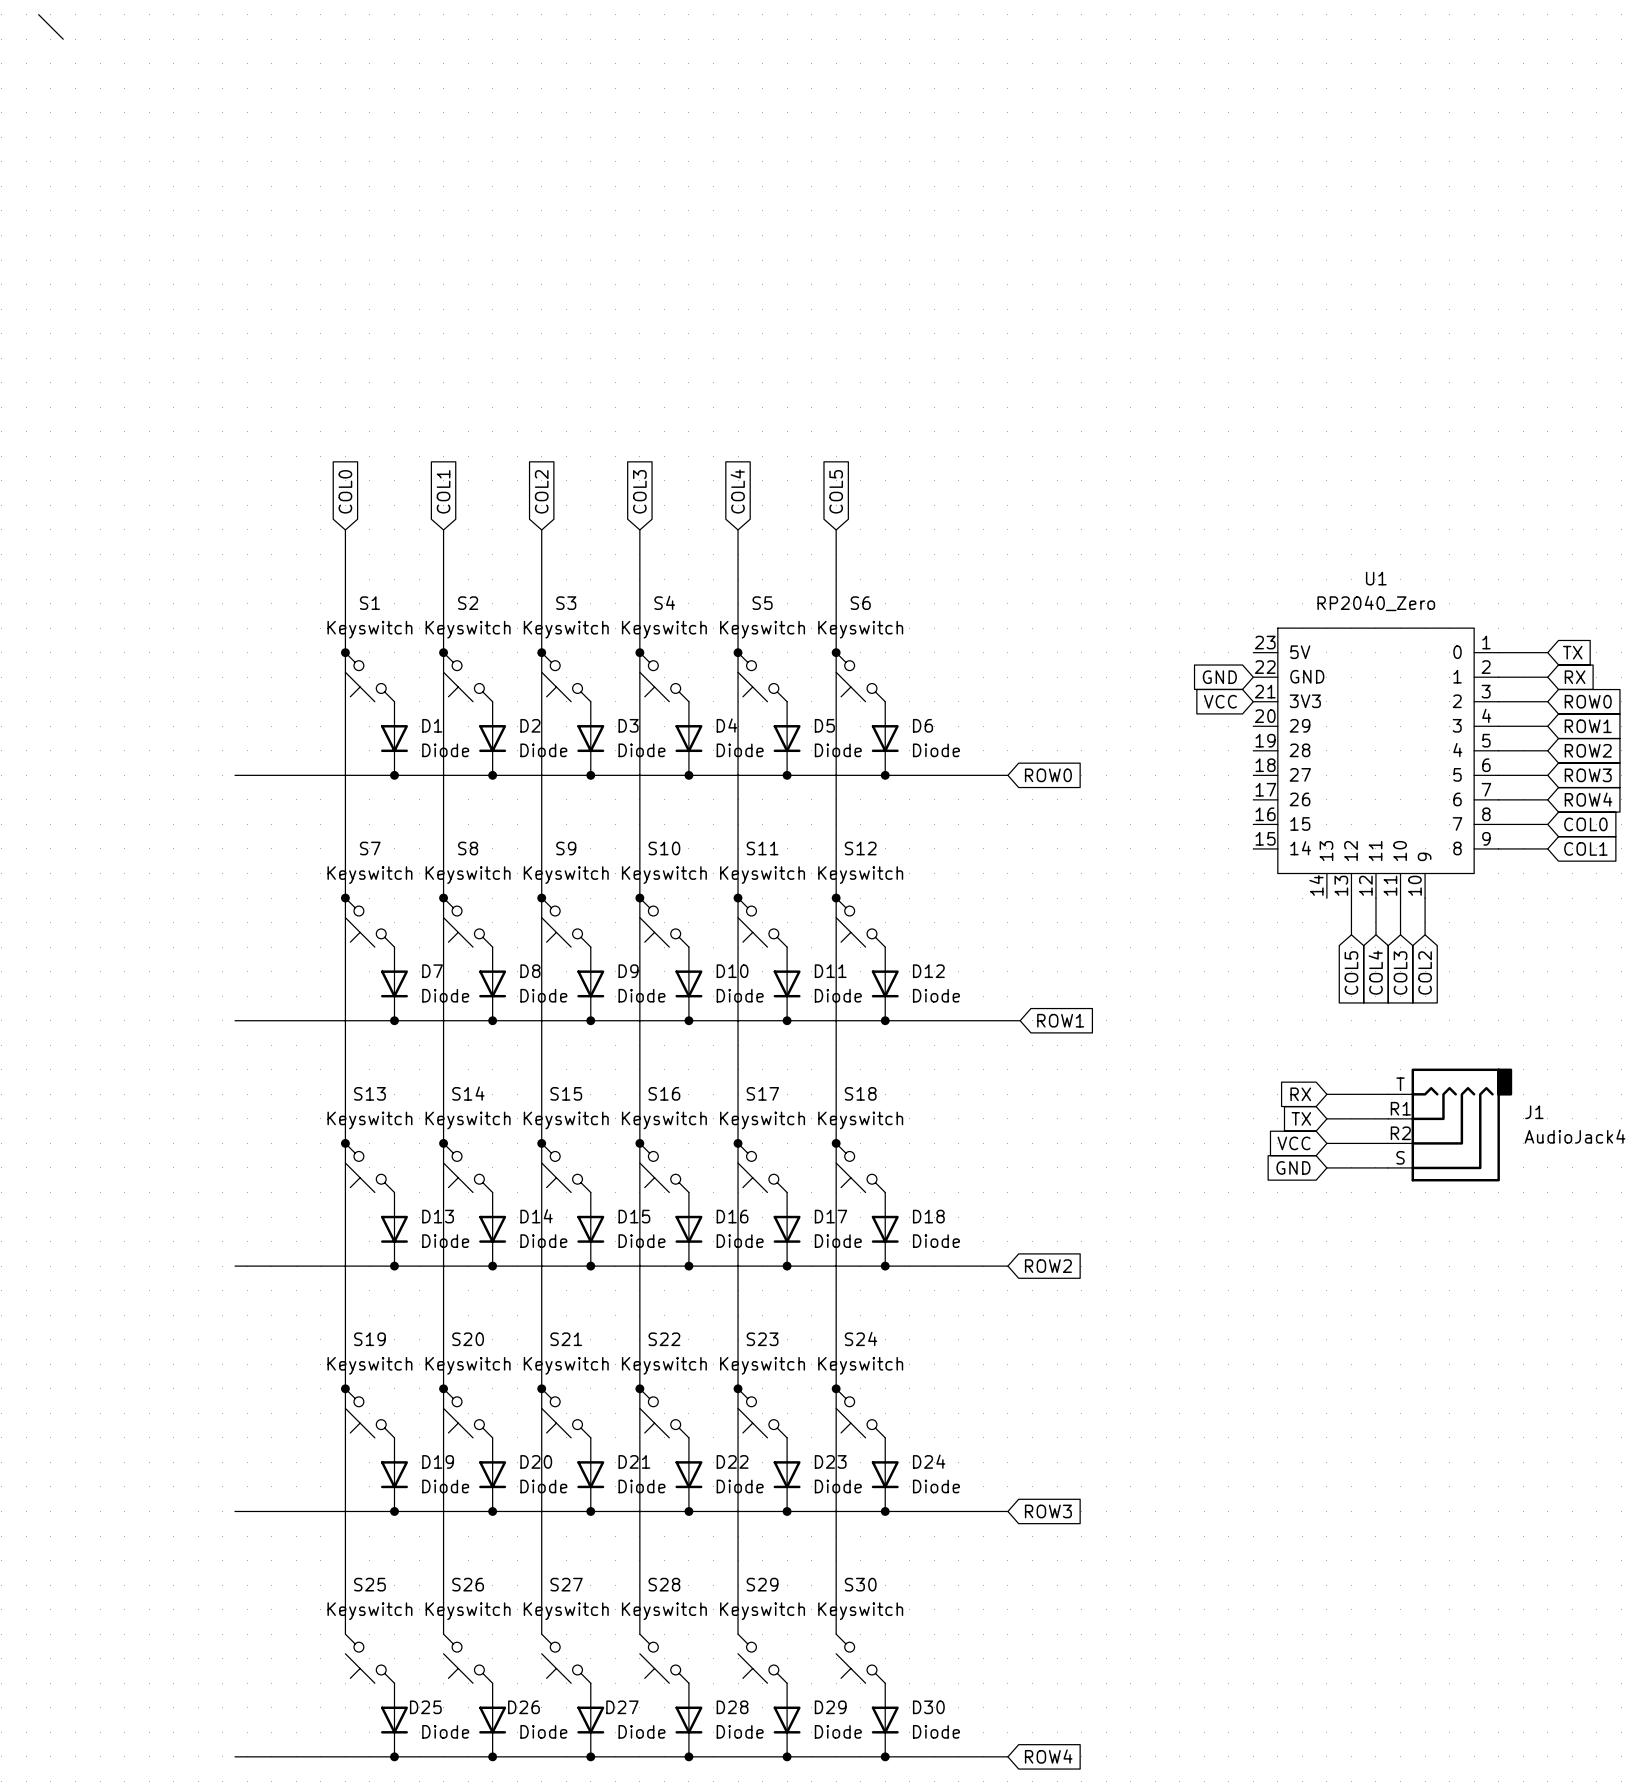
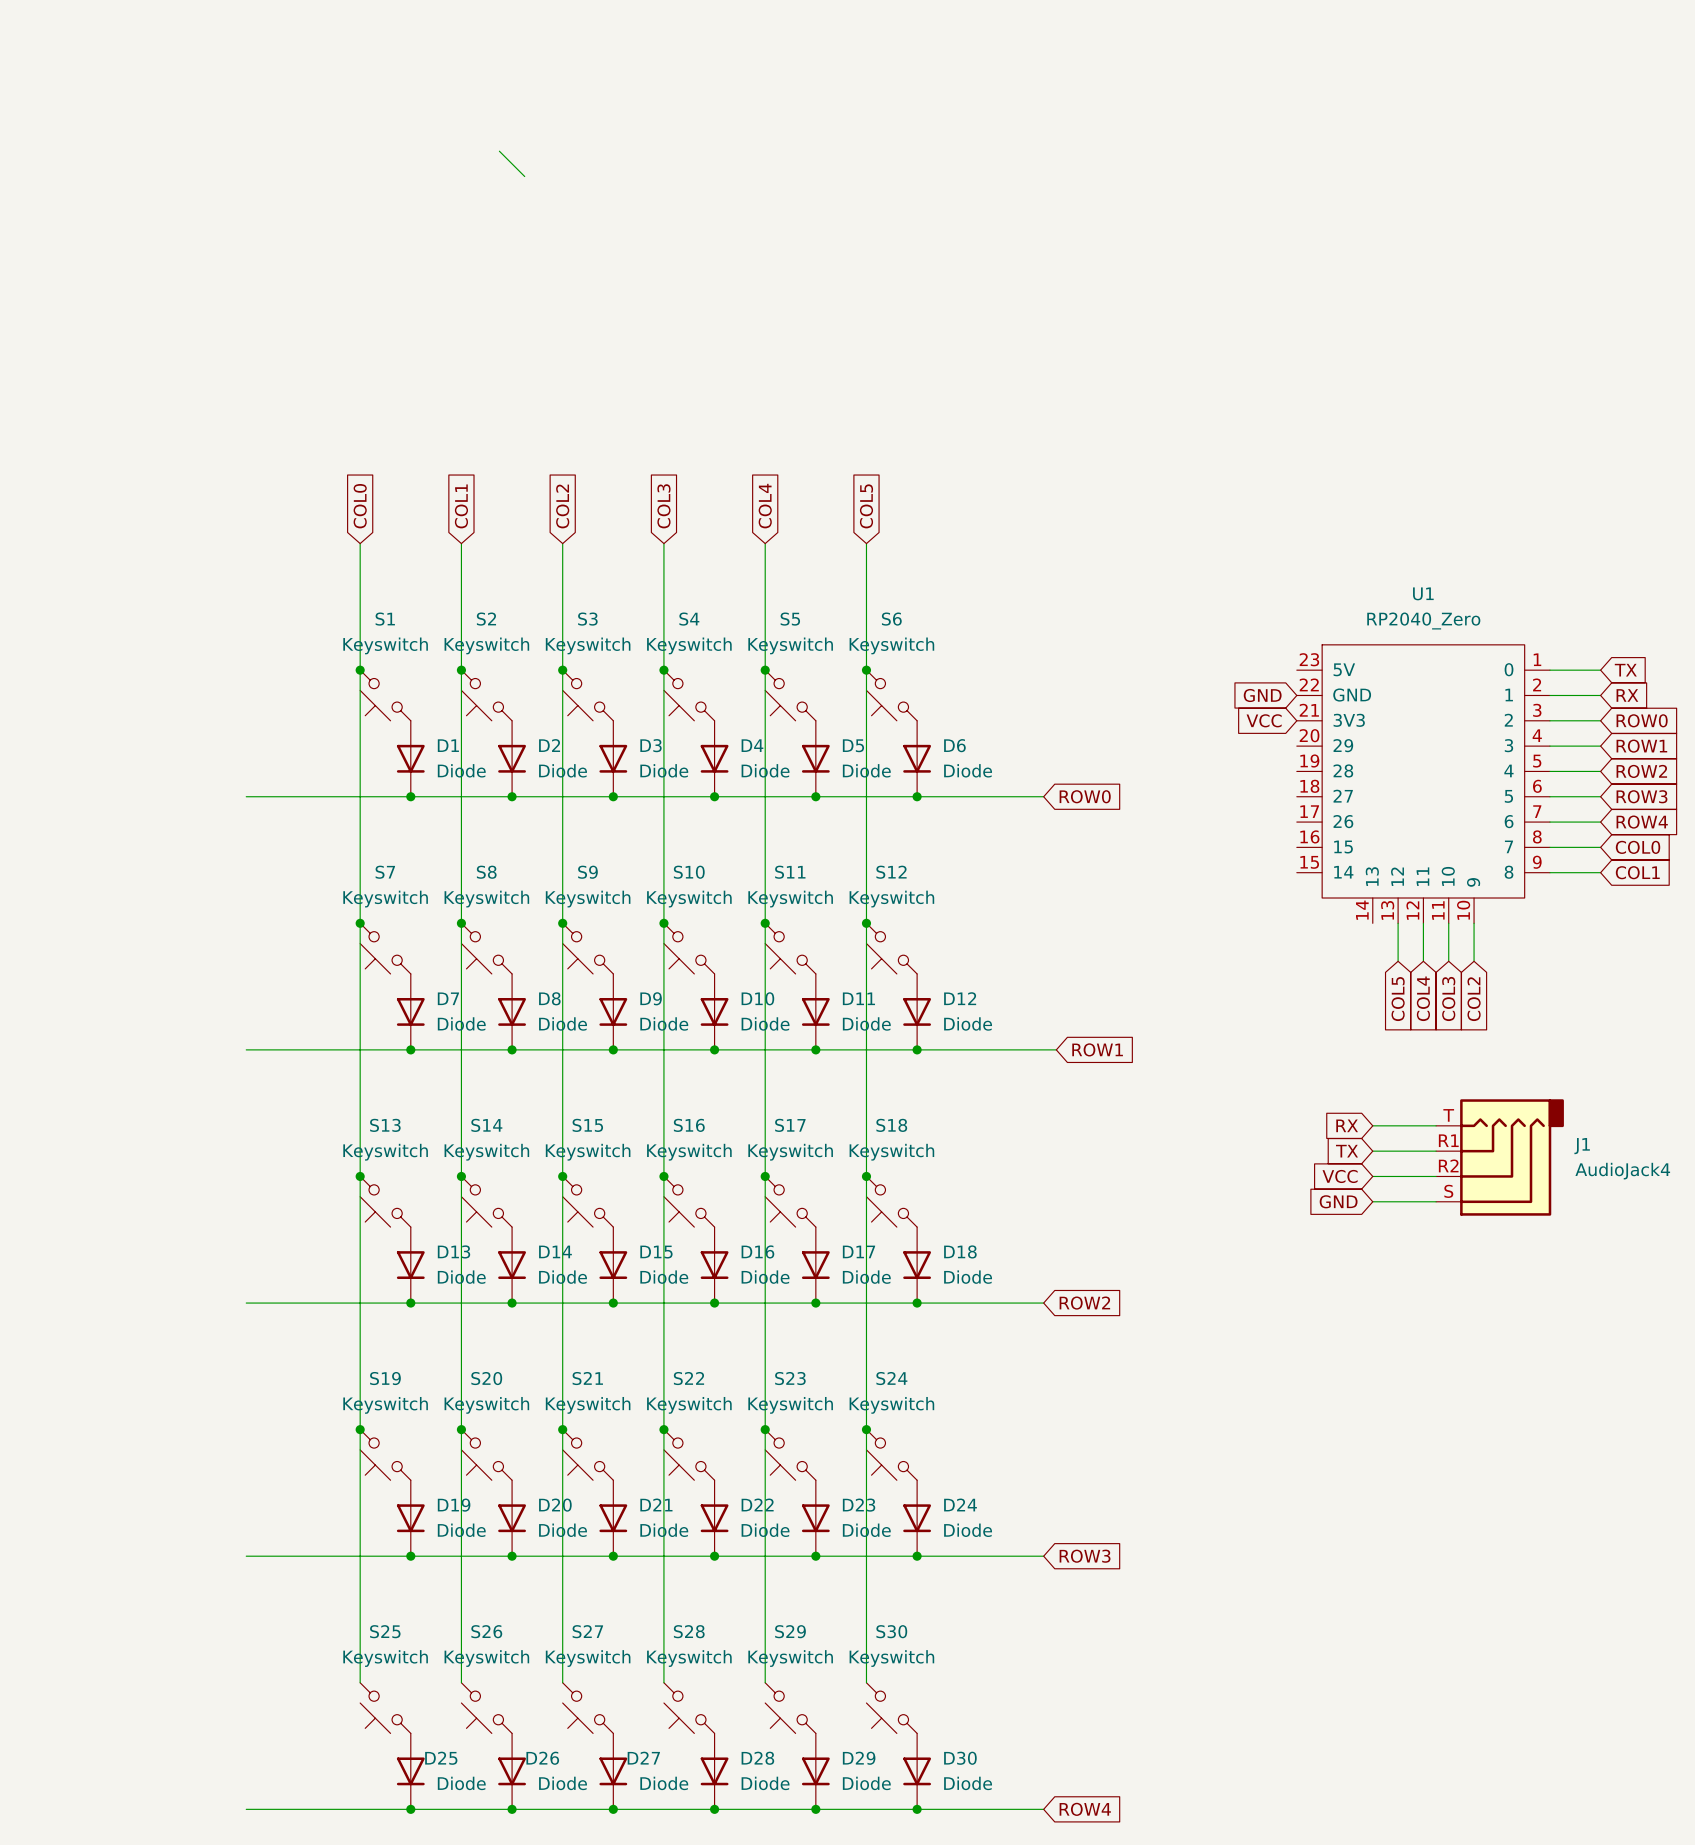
wire: (38, 14) (63, 39) -> none
wire: none -> (499, 151) (524, 176)

